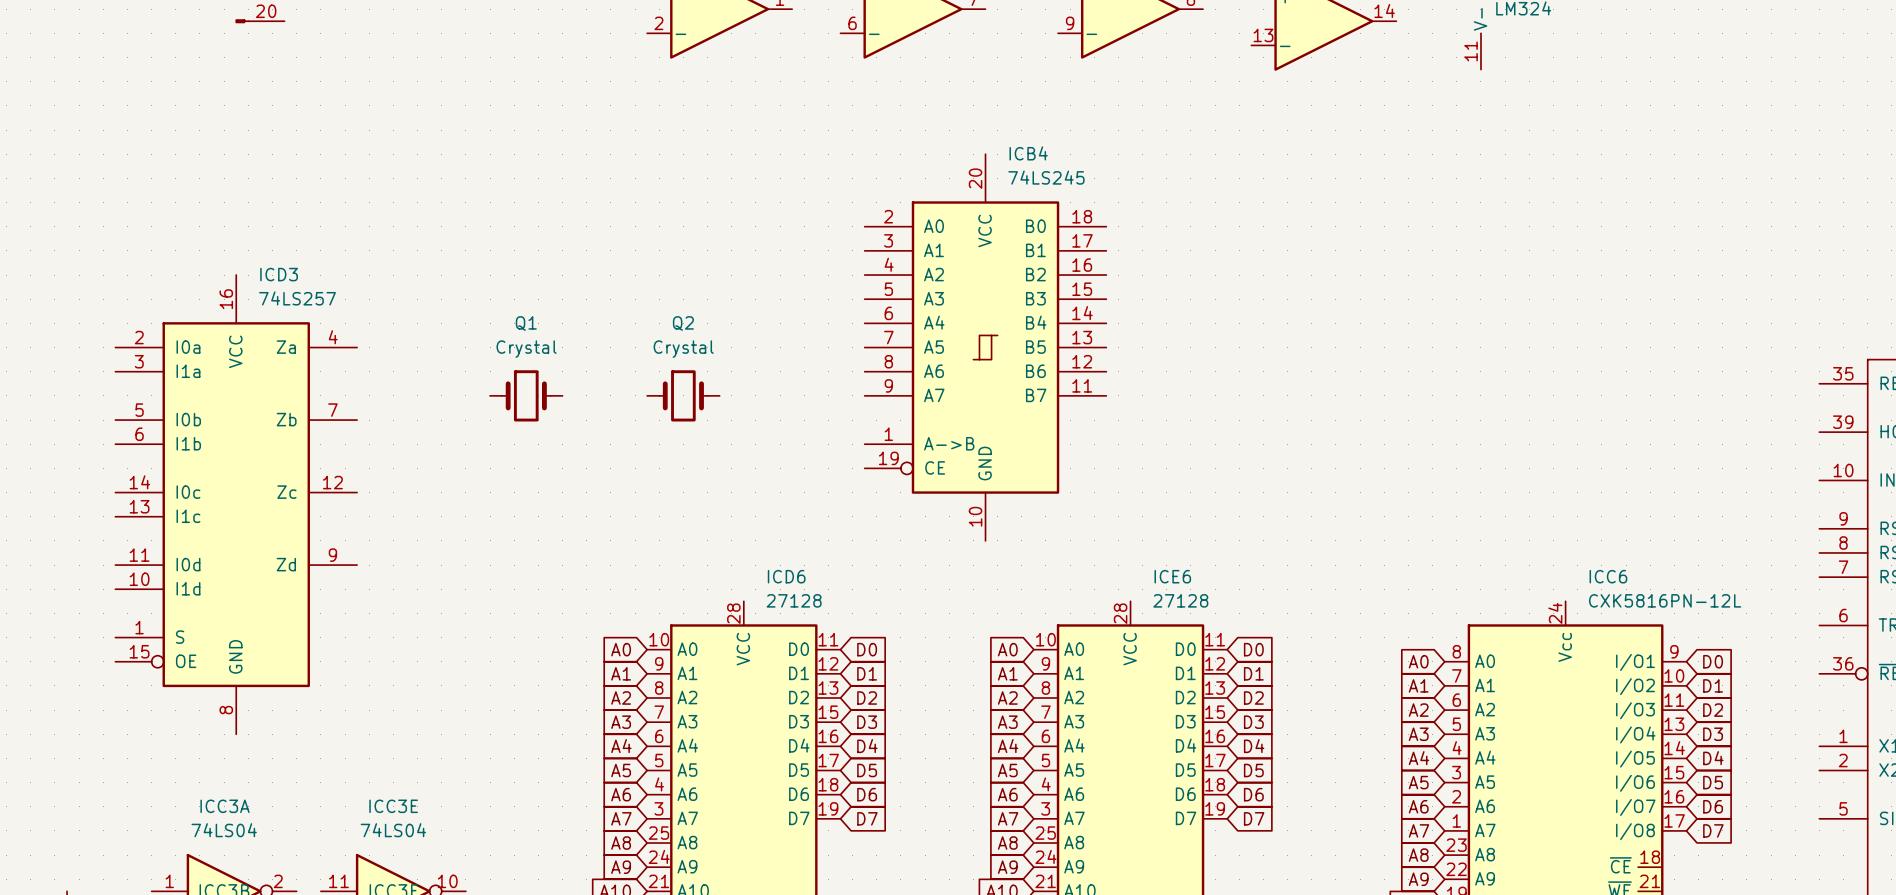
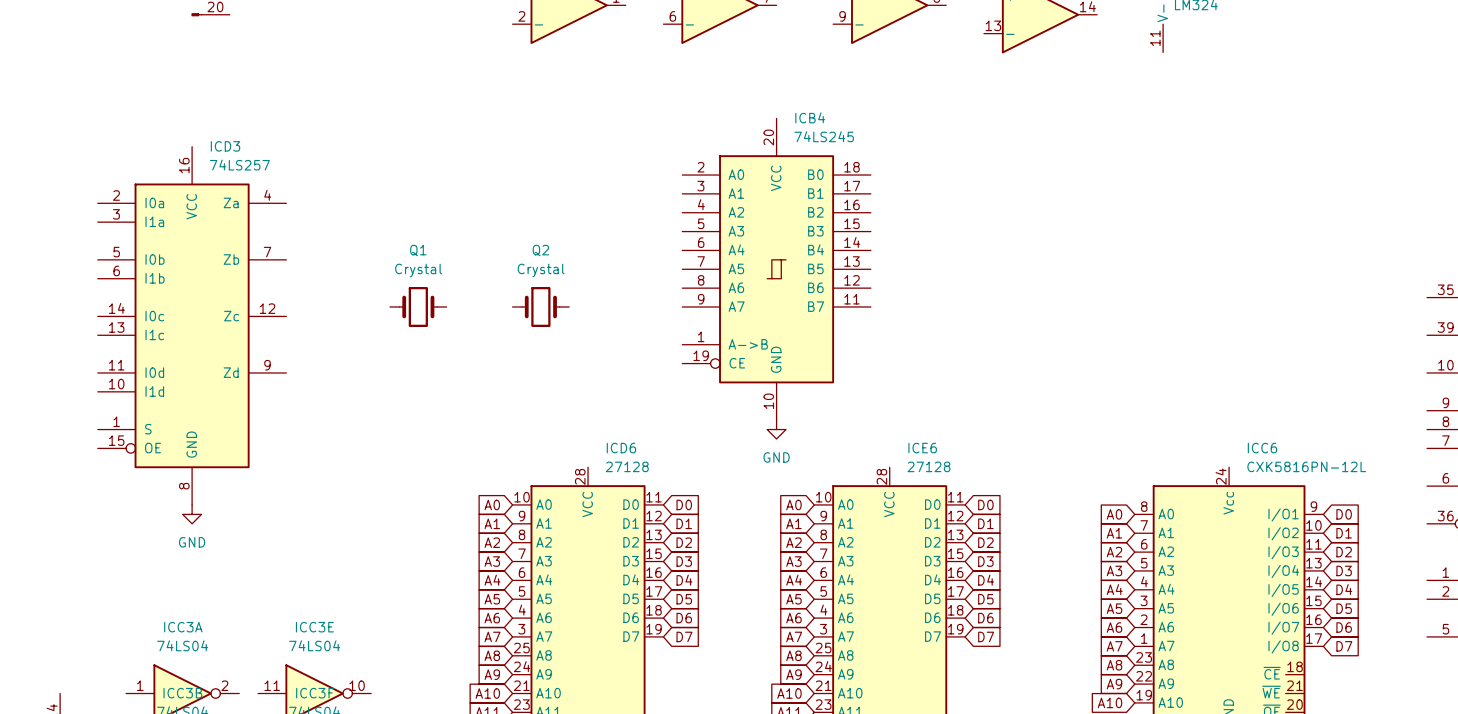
ICD3 position: (236, 504) -> (192, 325)
power symbol: none -> GND (776, 429)
power symbol: none -> GND (192, 514)

